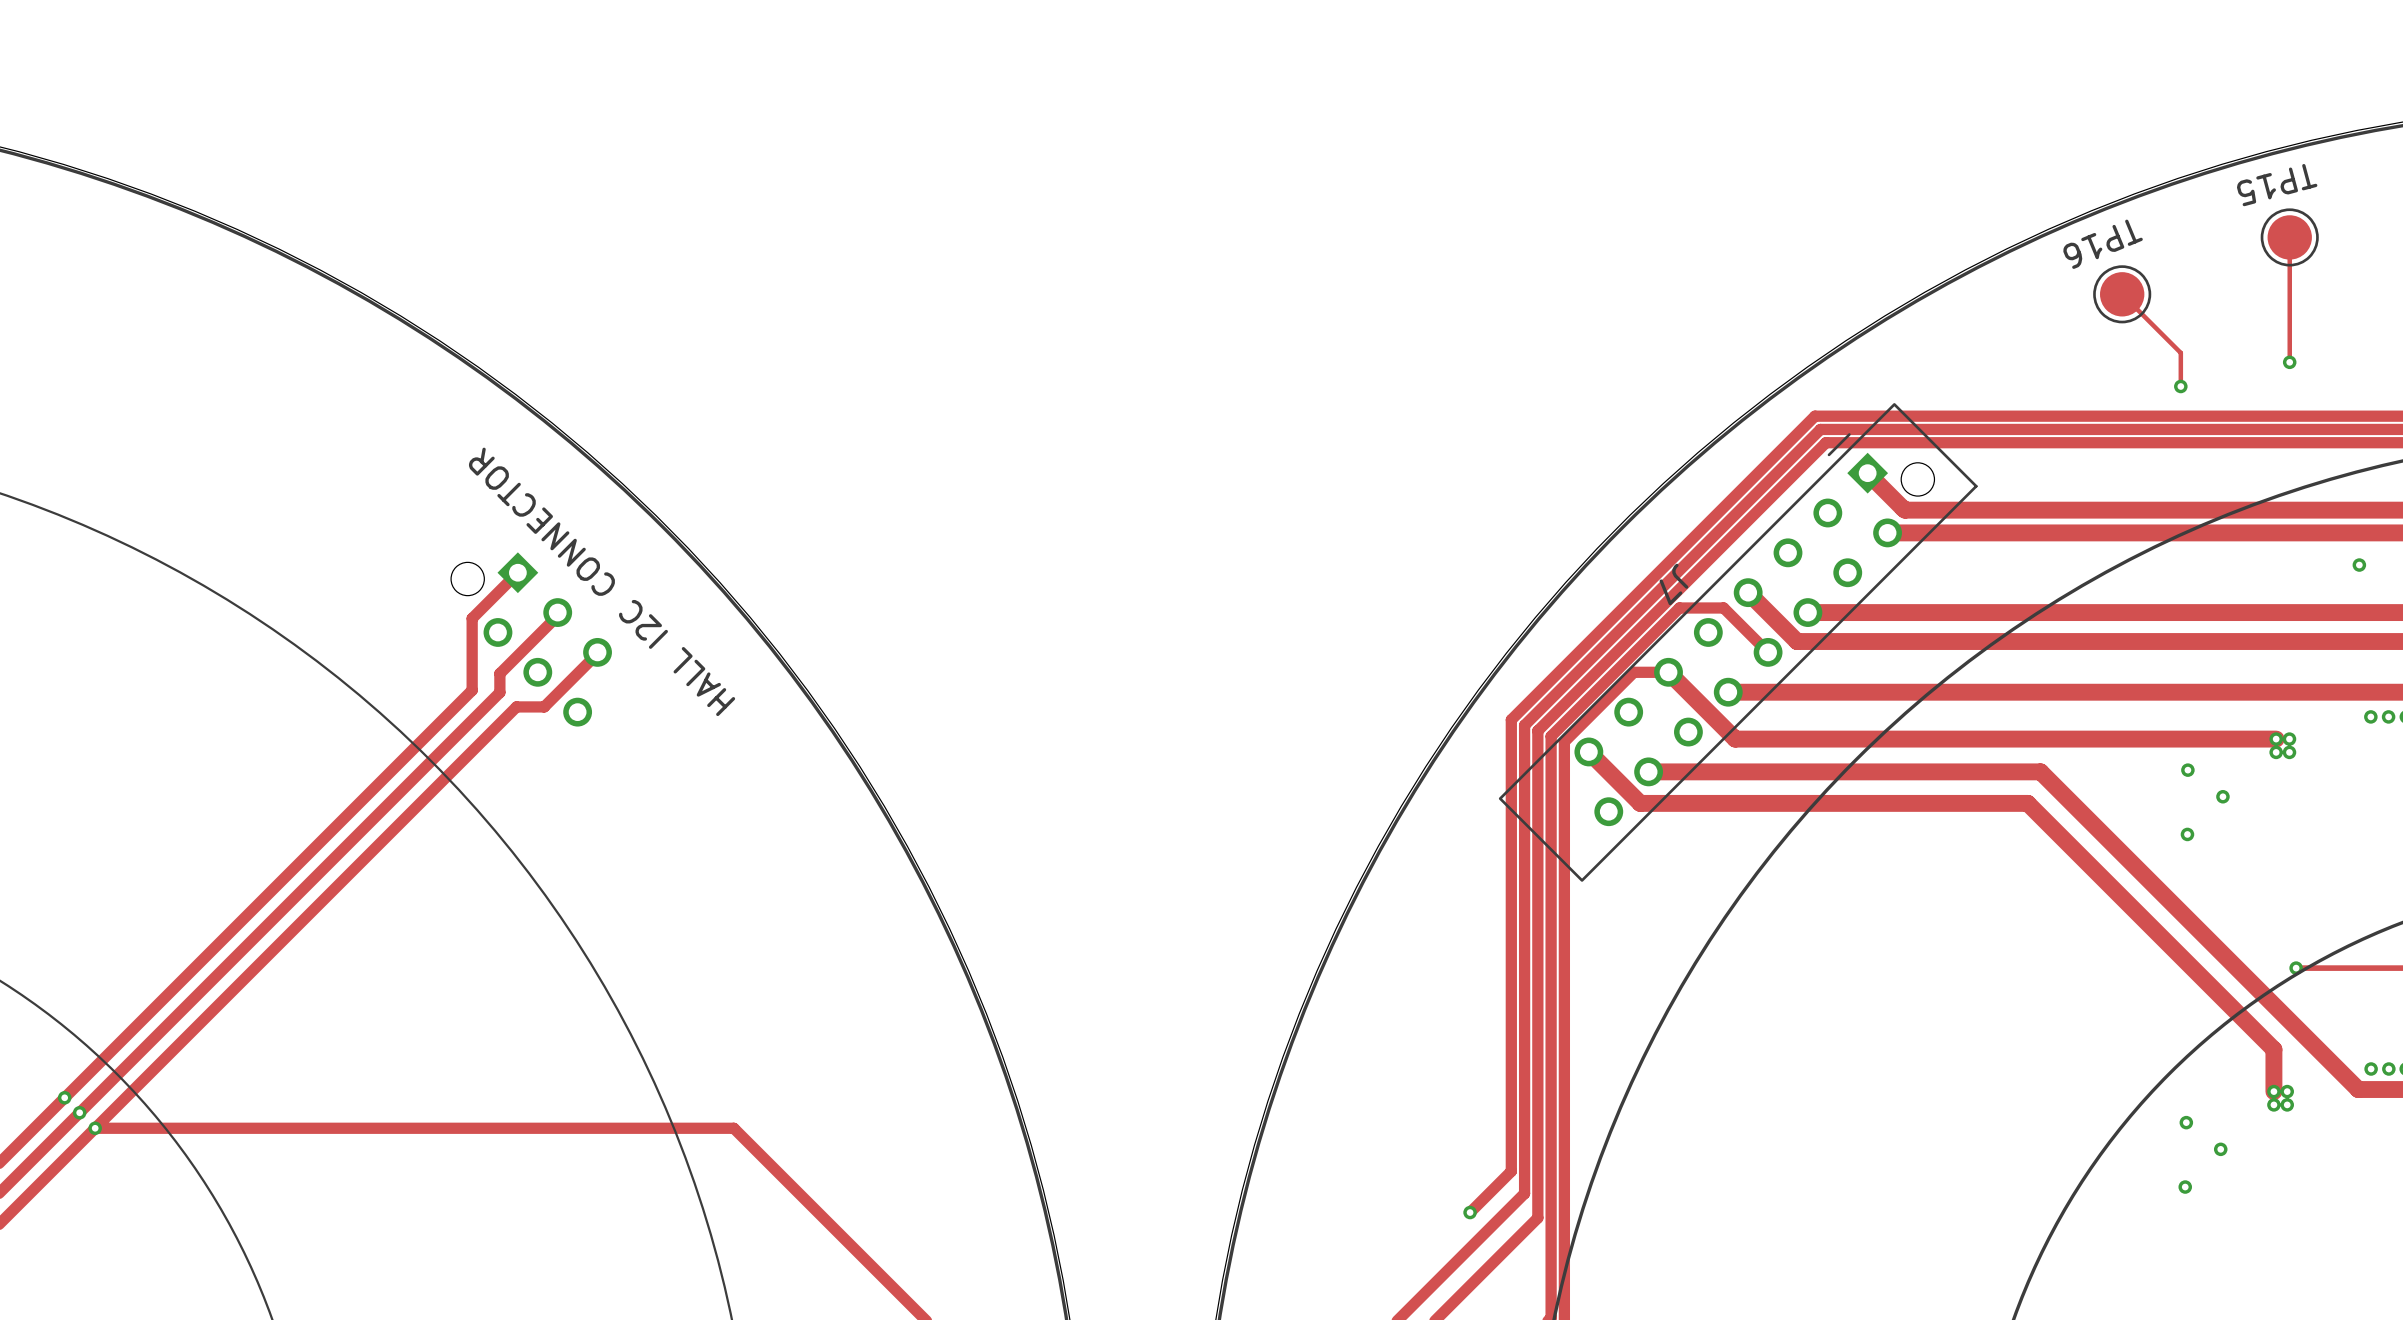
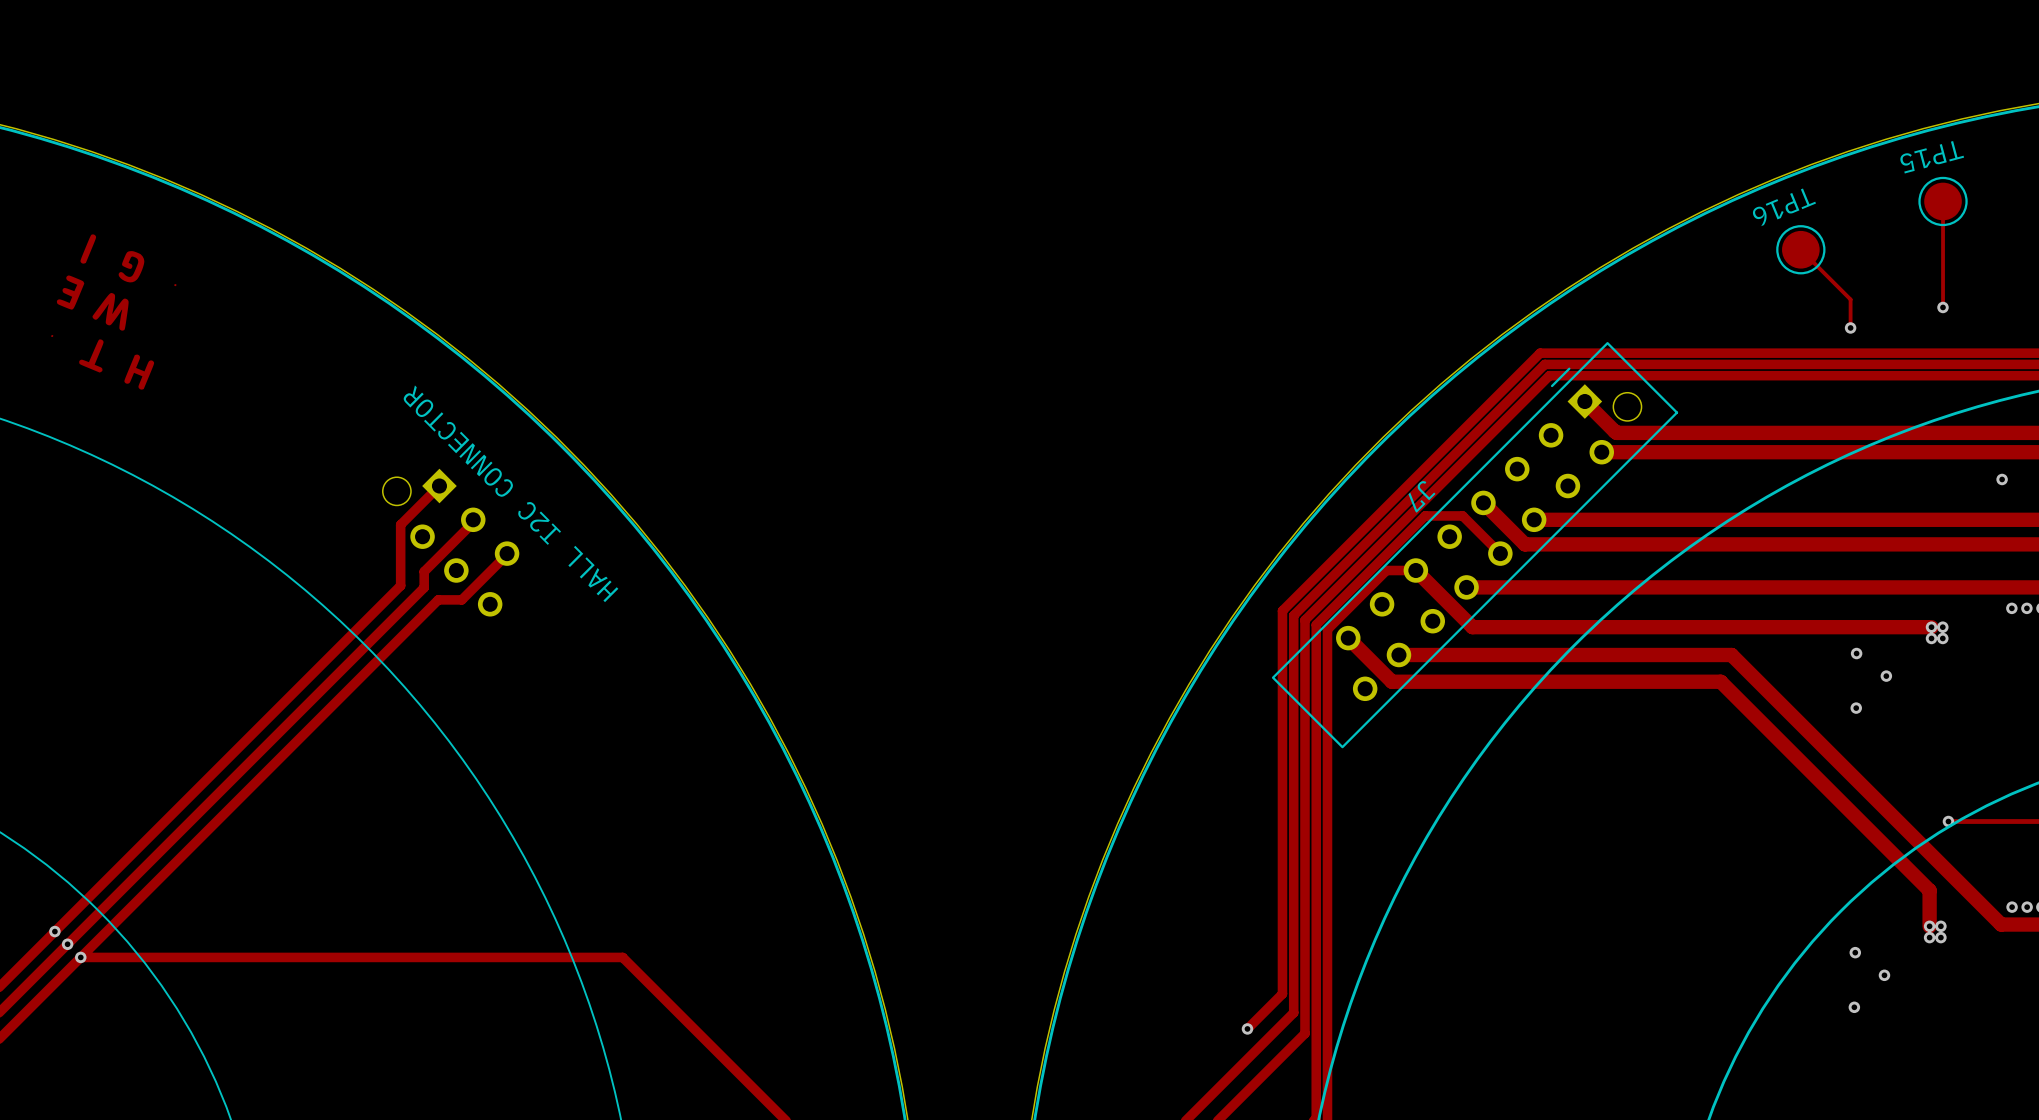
drawing: none -> [51, 234, 177, 390]

